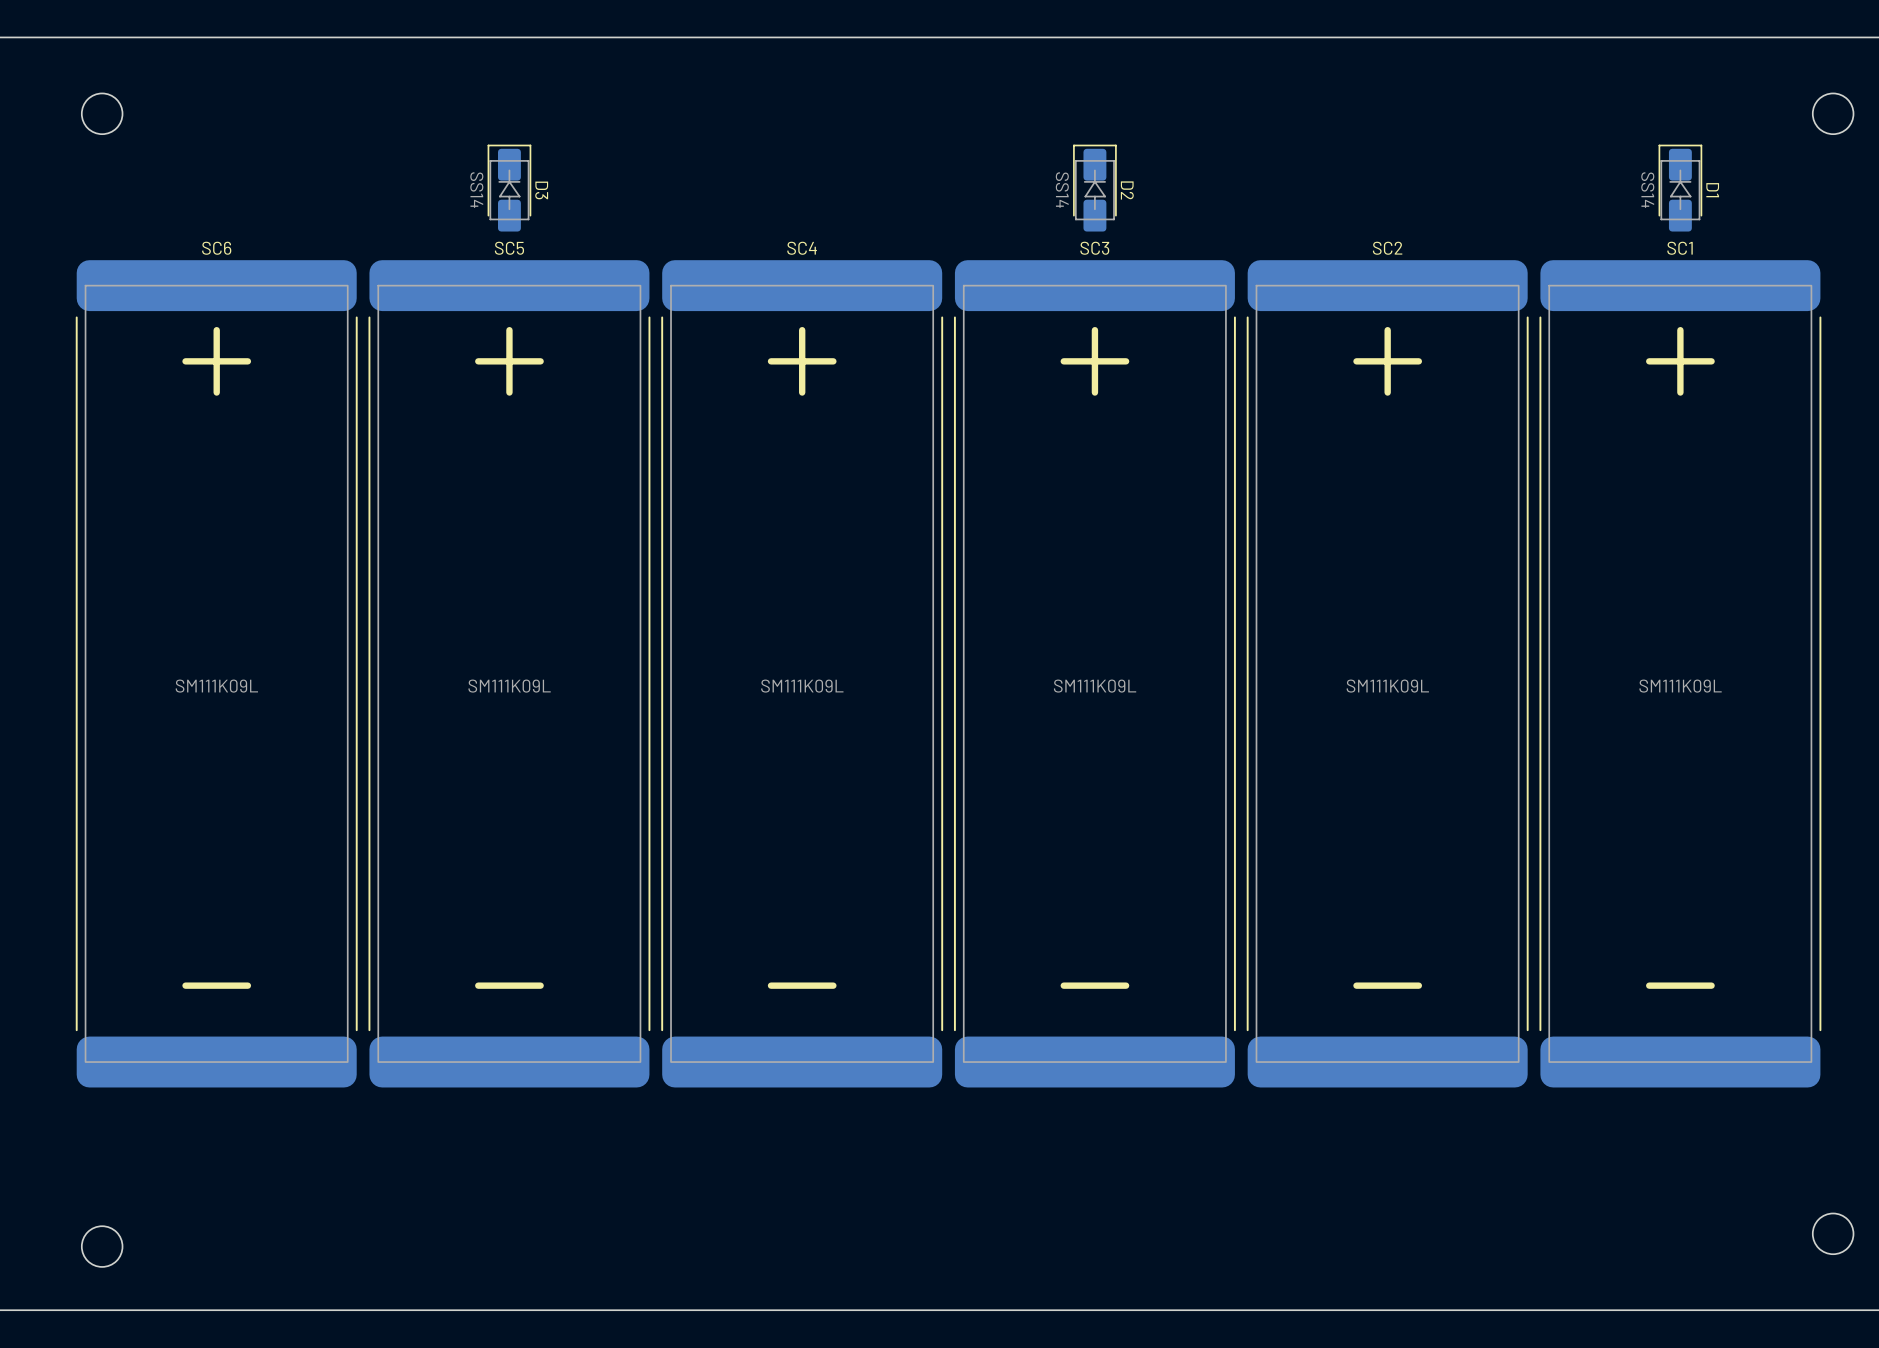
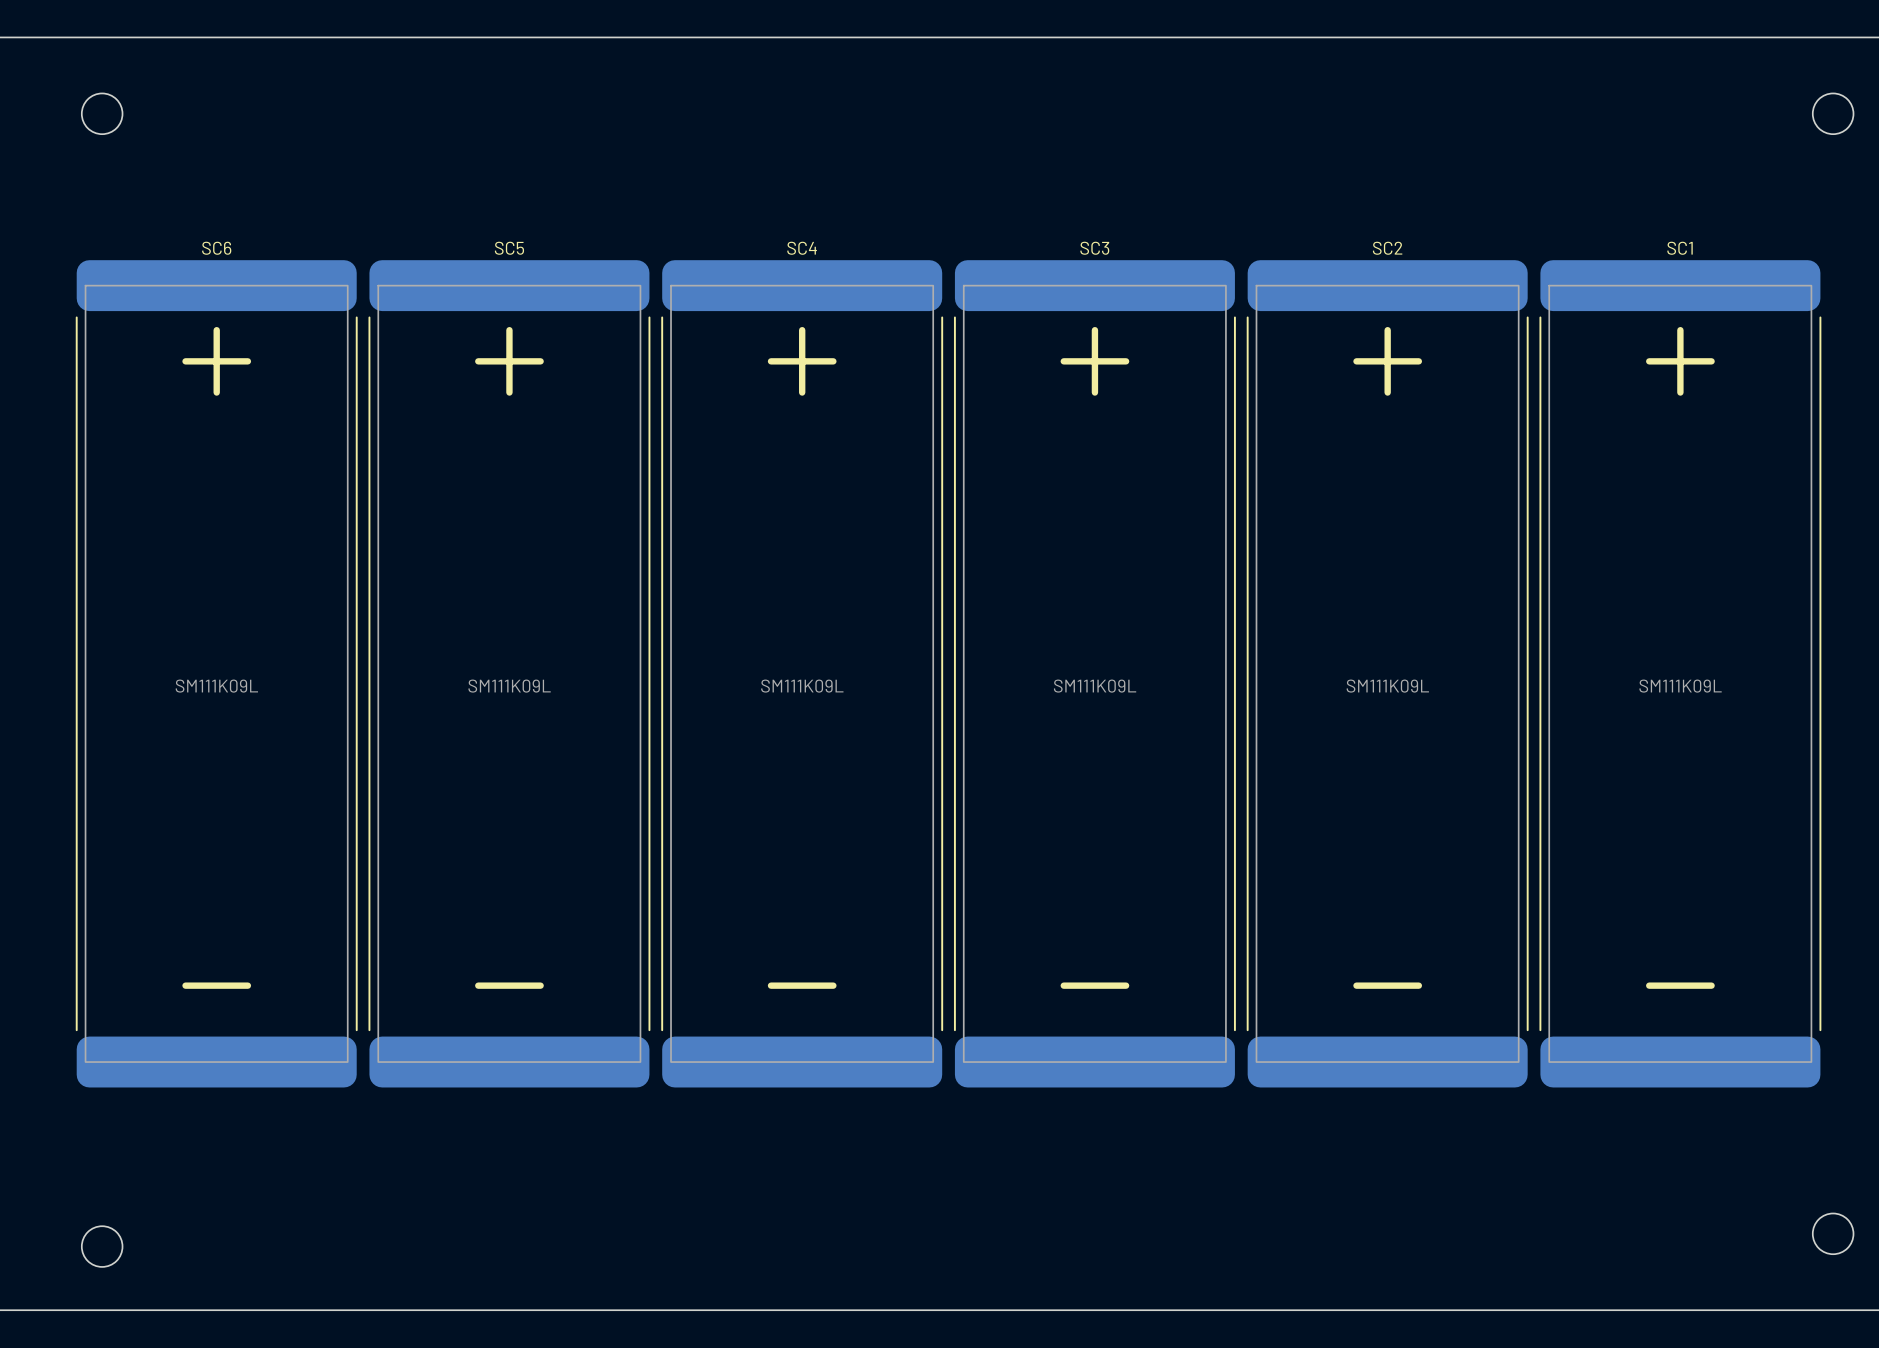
D3: SS14 (509, 188) -> none
D2: SS14 (1094, 188) -> none
D1: SS14 (1680, 188) -> none

